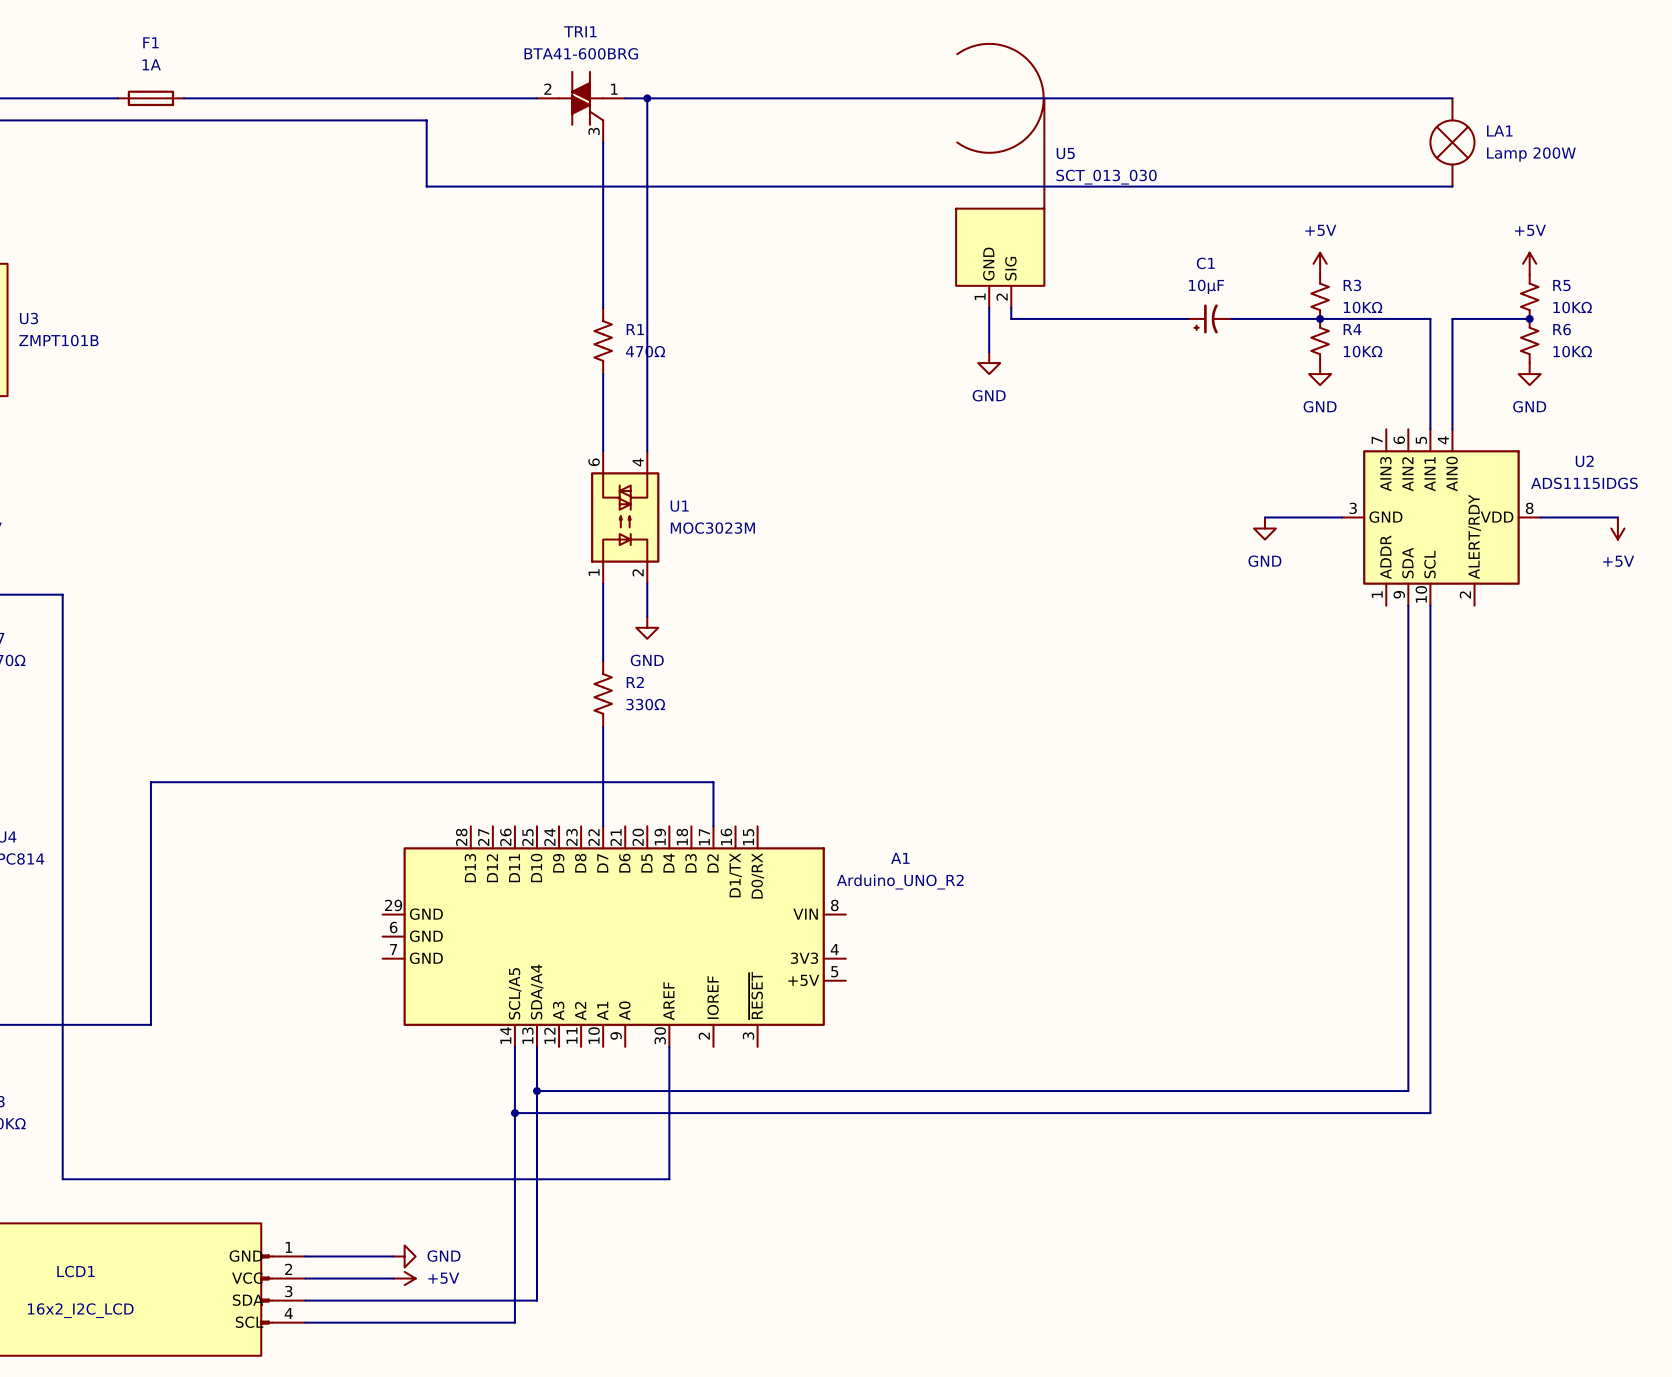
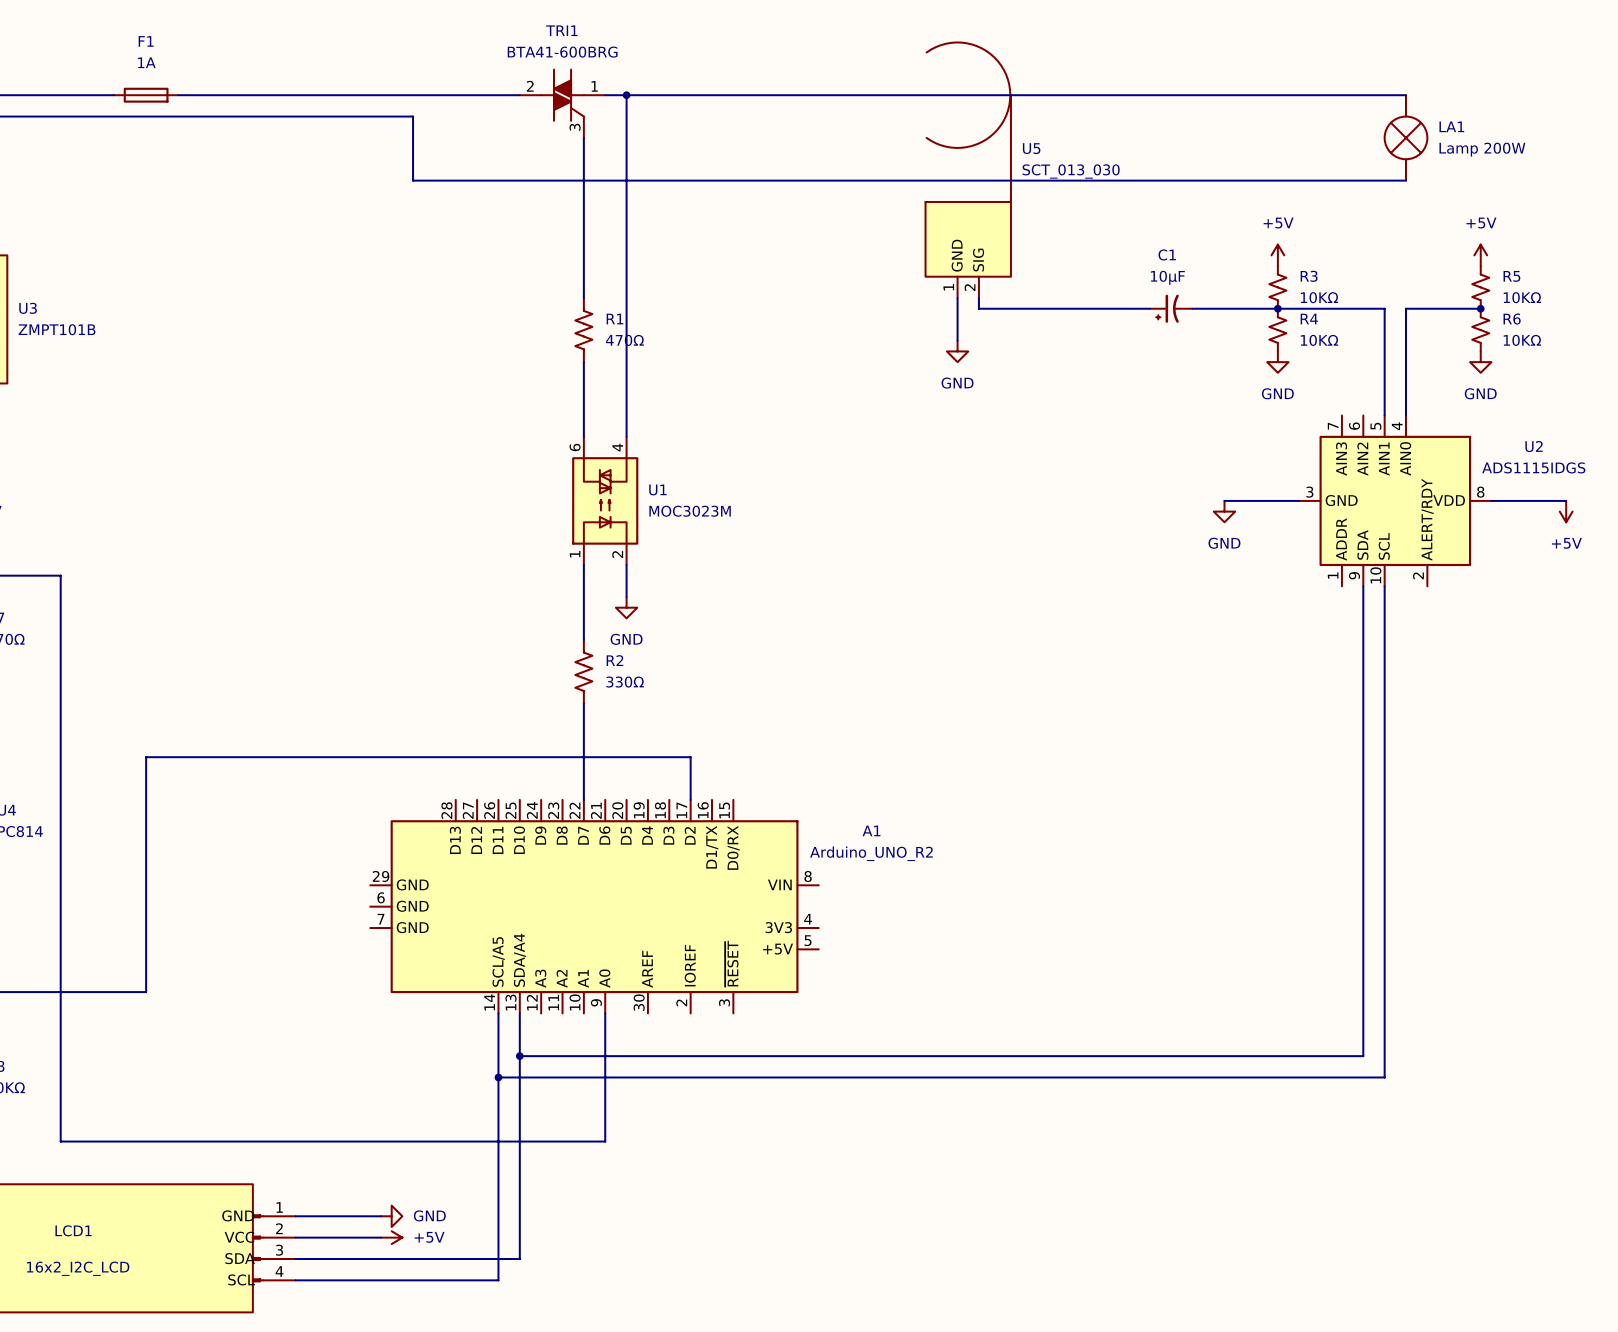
wire: (669, 1046) (669, 1179) (625, 1179) -> (605, 1013) (605, 1141)

